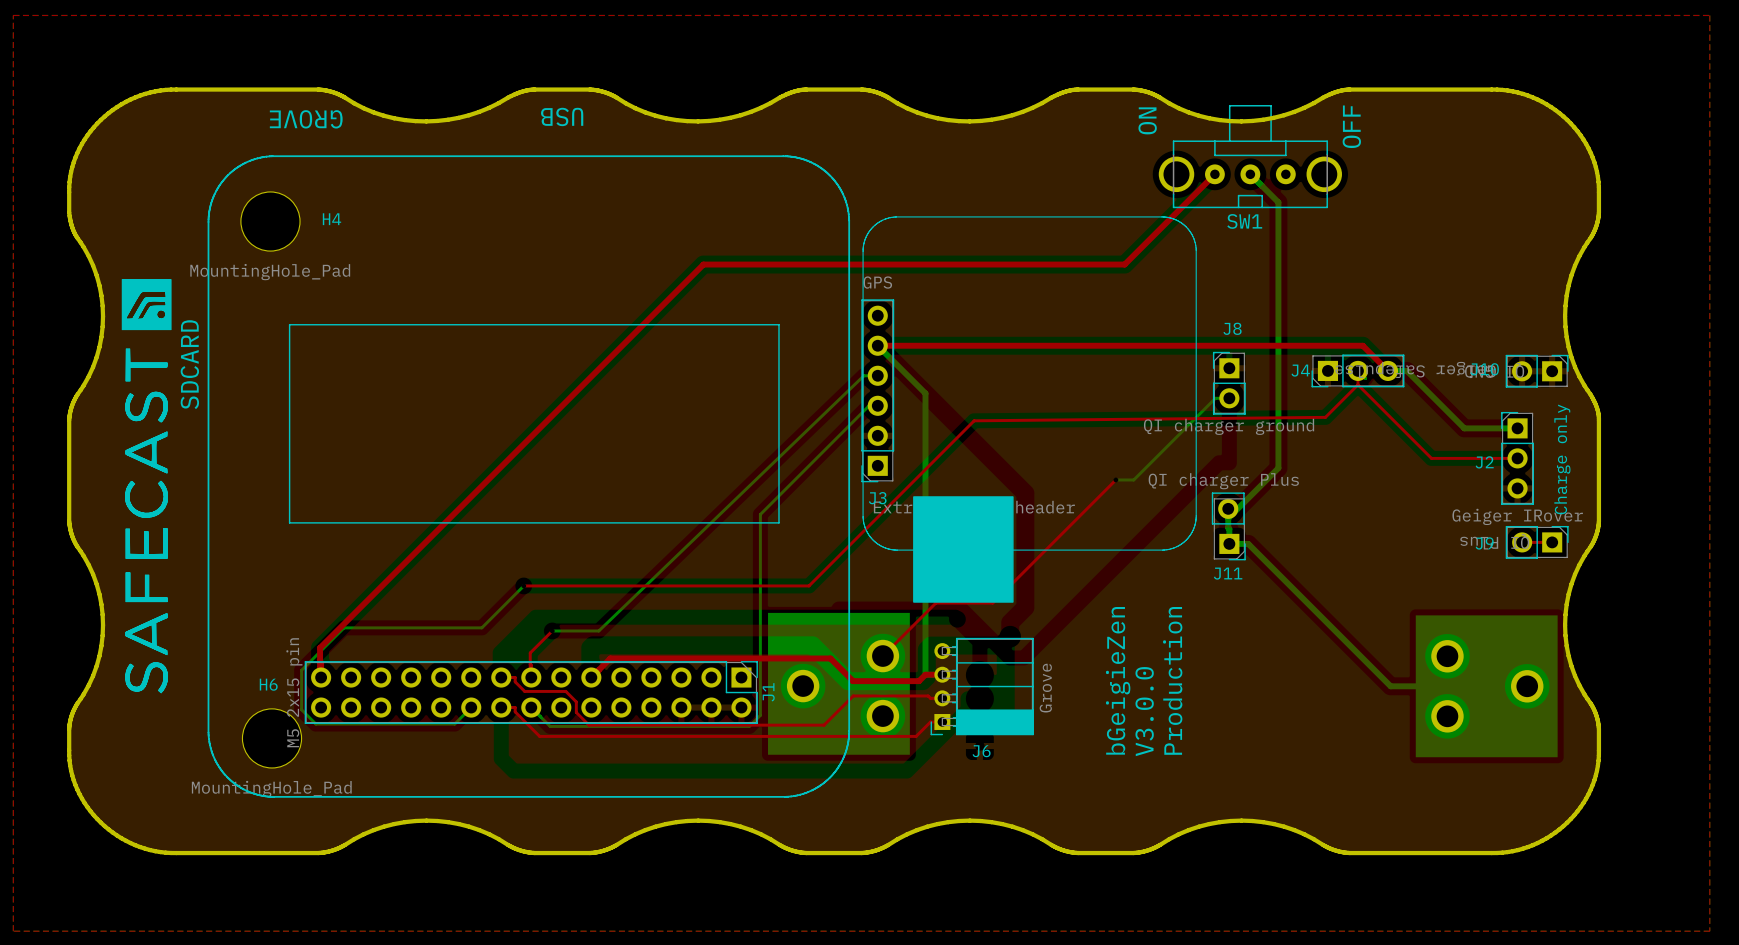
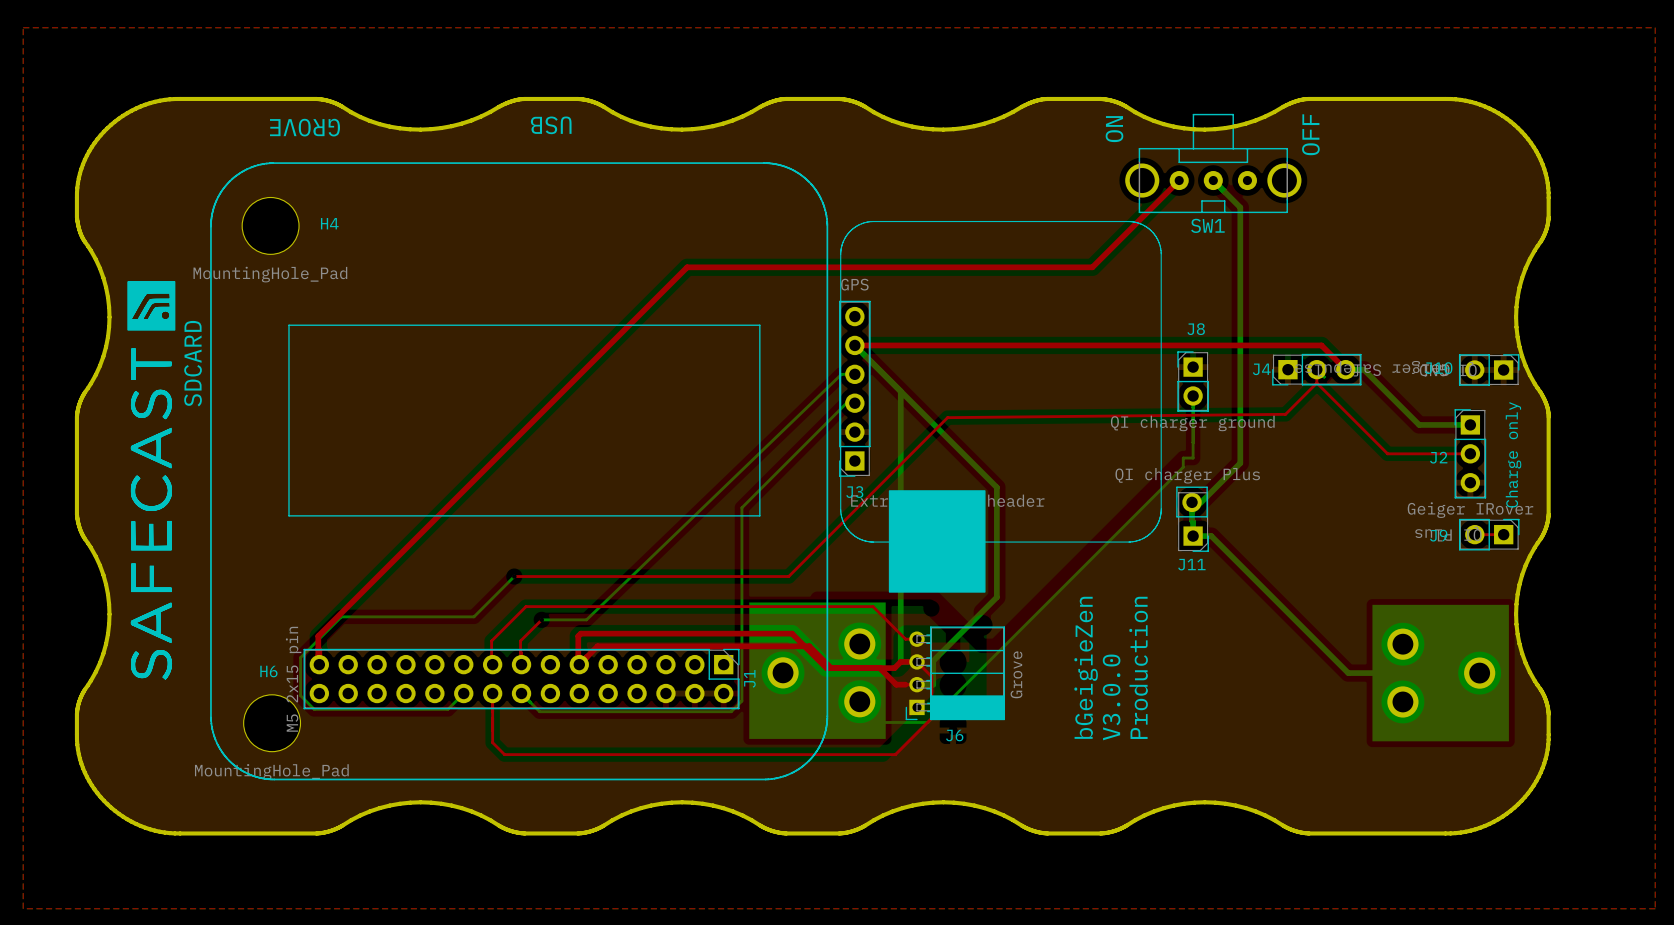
bottom track: none -> (863, 353) (996, 487) (996, 597) (933, 660) (933, 684) (916, 684)
bottom track: (1229, 398) (1215, 398) (1133, 479) (1115, 479) -> (1193, 396) (1193, 458) (1183, 458) (1183, 467) (927, 722) (844, 722) (795, 672)
top track: (1115, 479) (992, 603) (935, 603) (882, 656) -> none
via: (1115, 479) -> none
top track: none -> (916, 639) (905, 639) (873, 606) (526, 606) (491, 641) (491, 662)
top track: (501, 677) (515, 677) (515, 681) (524, 691) (565, 691) (576, 701) (576, 712) (588, 725) (824, 725) (853, 695) (928, 695) (930, 698) -> (578, 662) (578, 636) (580, 633) (792, 633) (826, 668) (879, 668) (896, 684) (905, 684)
top track: (501, 707) (515, 707) (515, 711) (539, 736) (916, 736) (930, 721) (942, 721) -> (492, 693) (492, 742) (504, 754) (895, 754) (931, 718) (931, 676) (917, 661)

